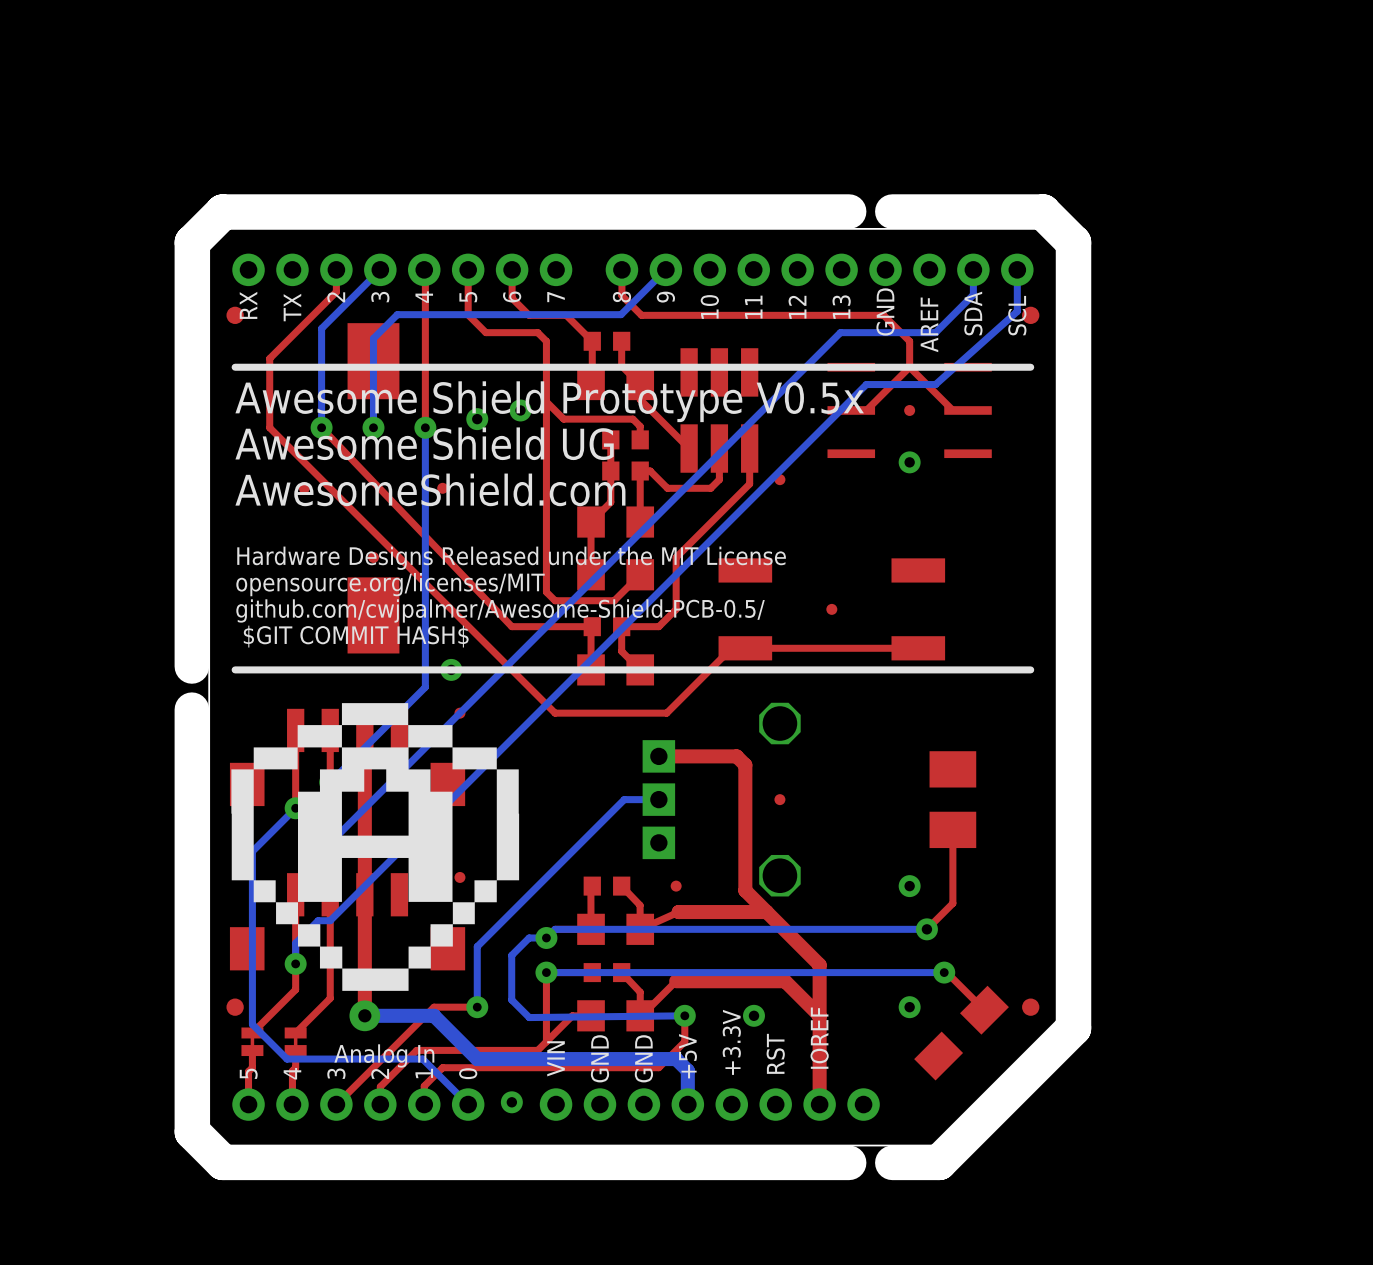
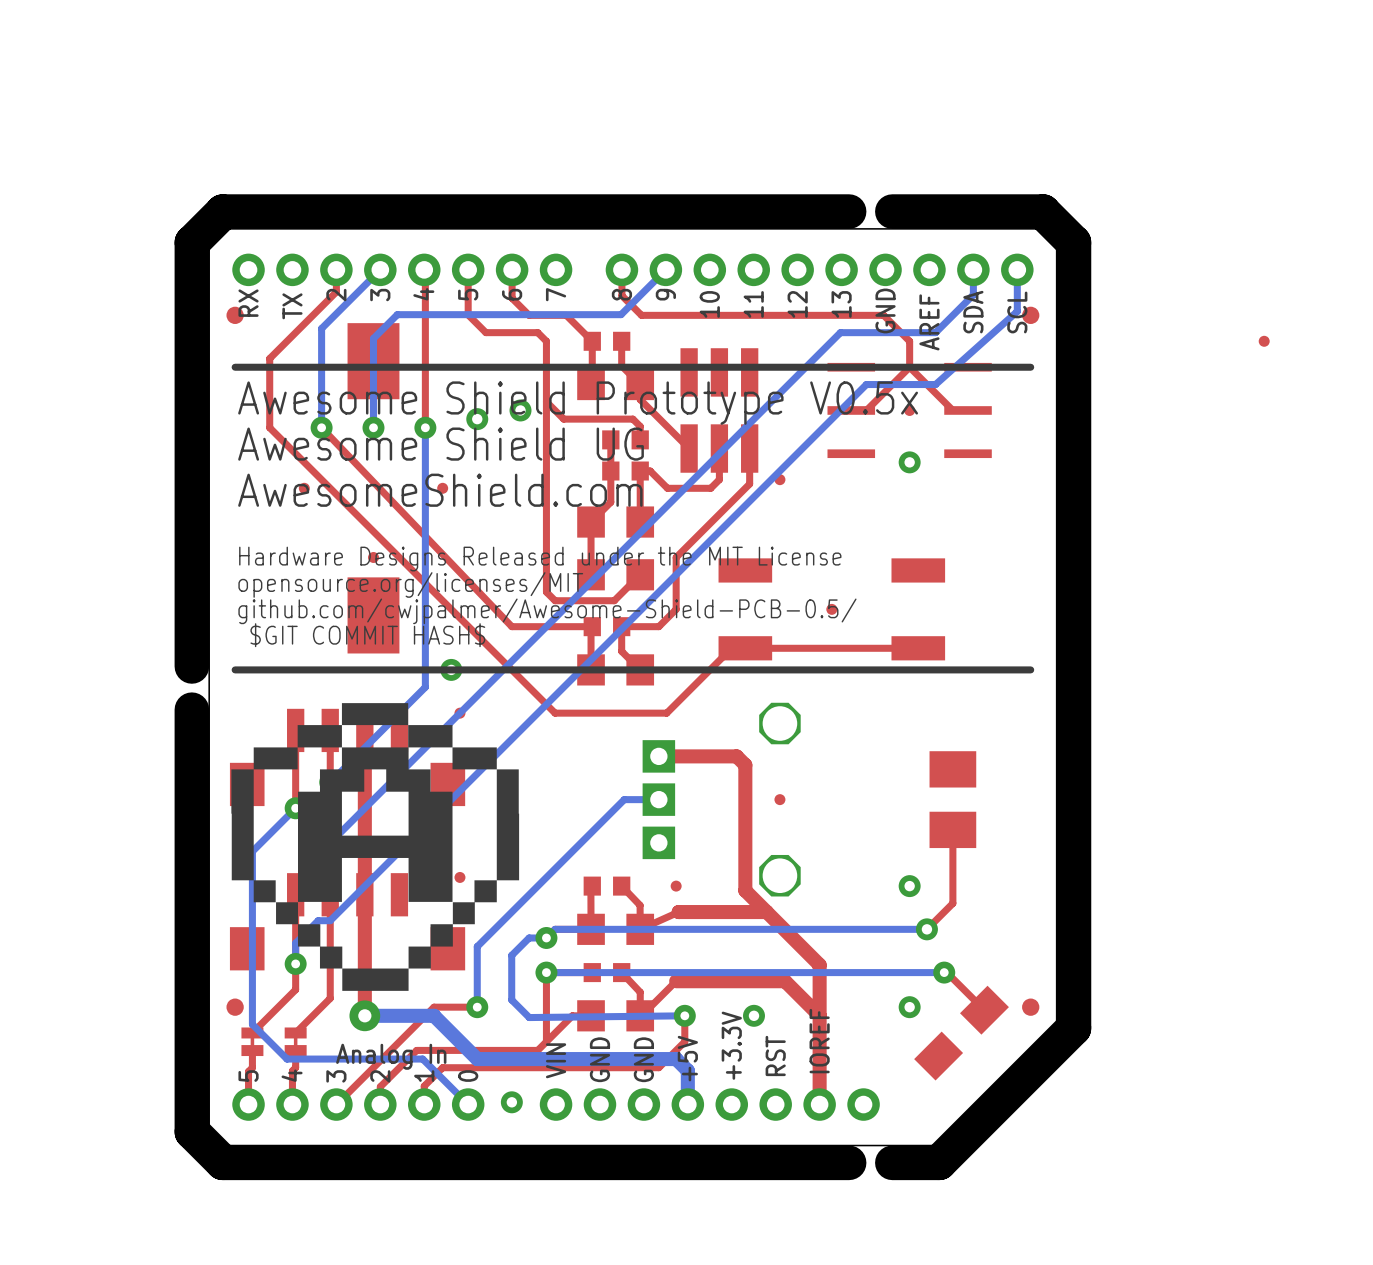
part: none -> (1264, 341)

